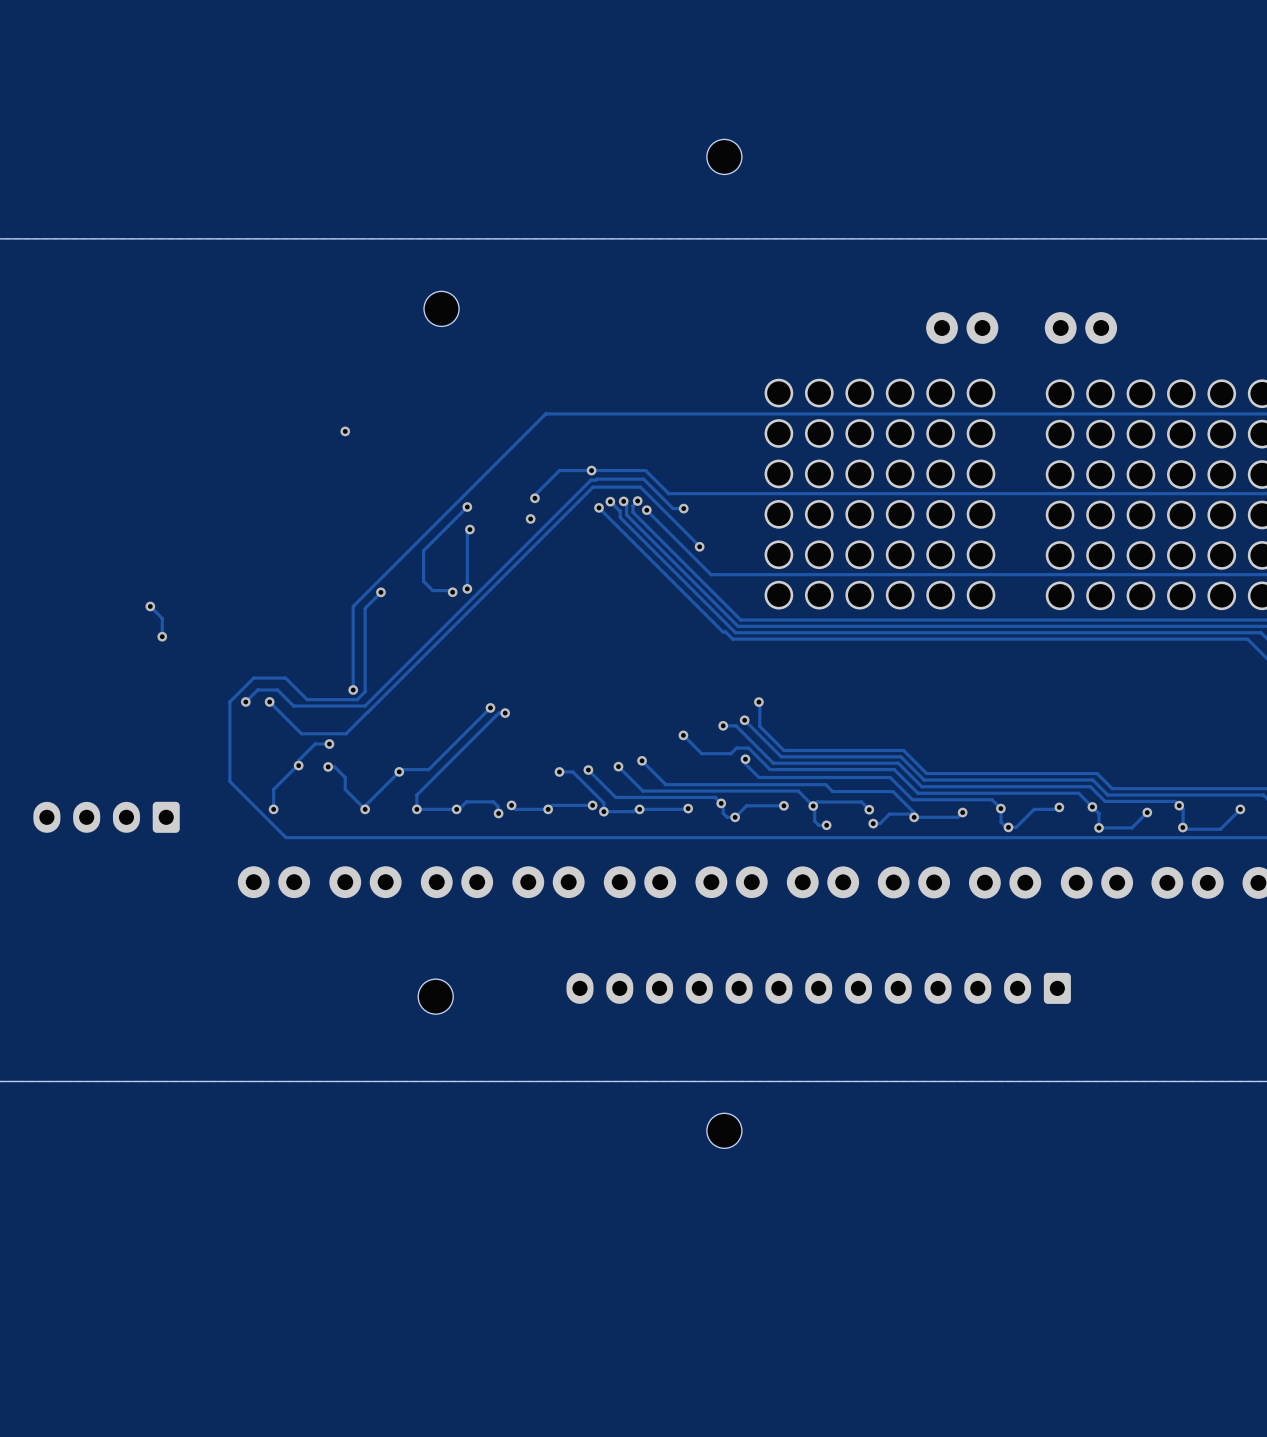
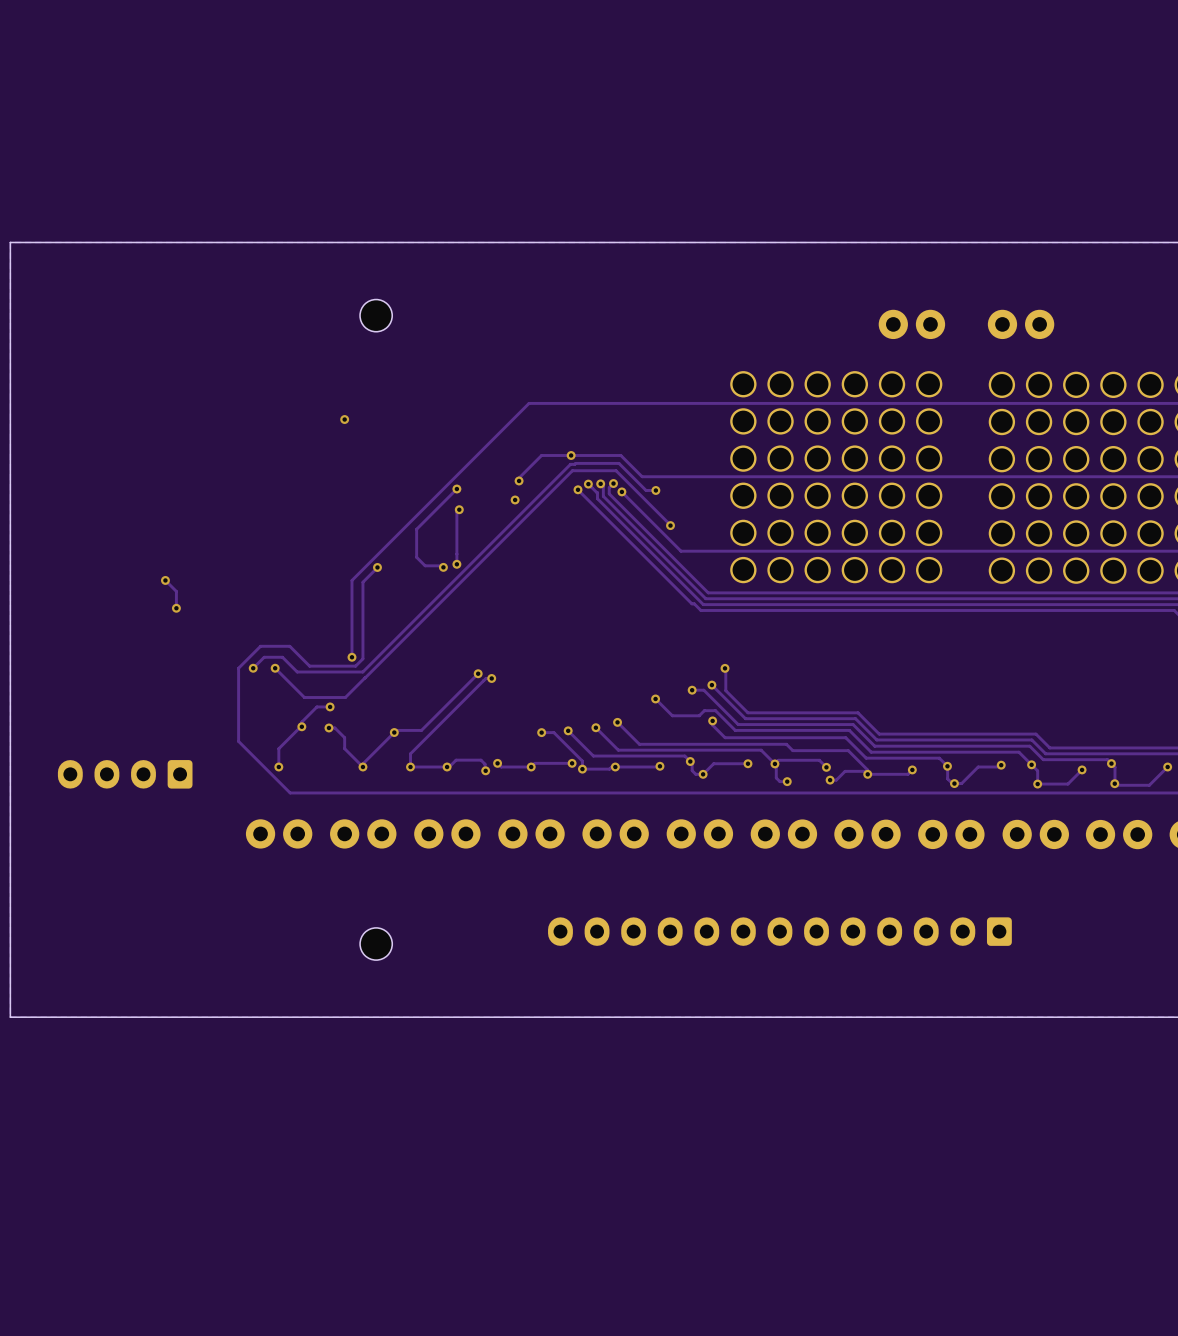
part: (724, 156) -> none
part position: (441, 308) -> (376, 315)
part position: (435, 996) -> (376, 944)
part: (724, 1130) -> none

